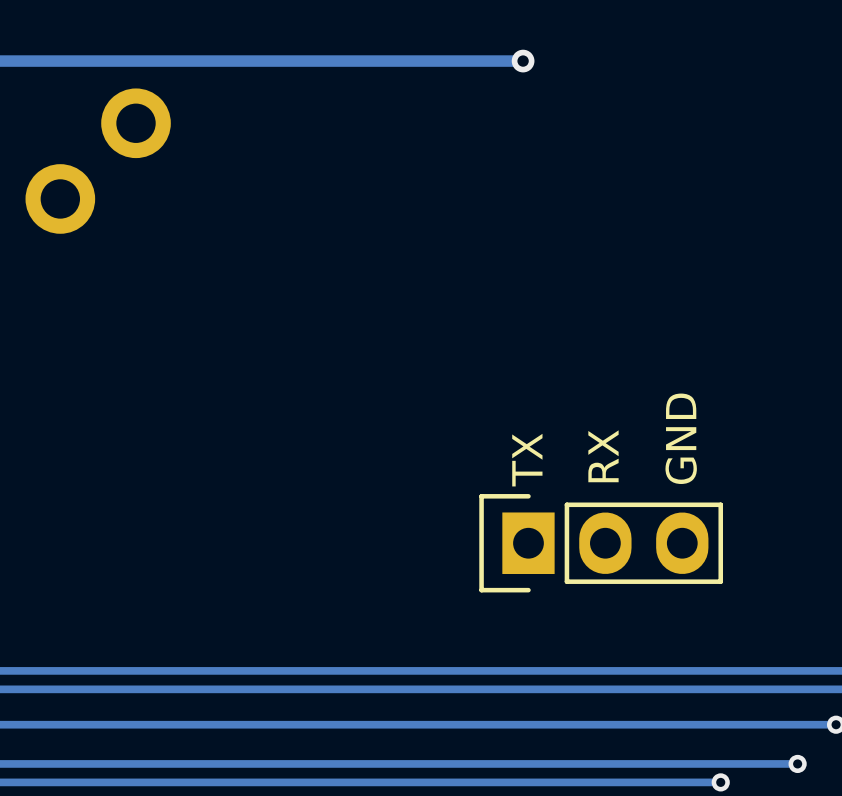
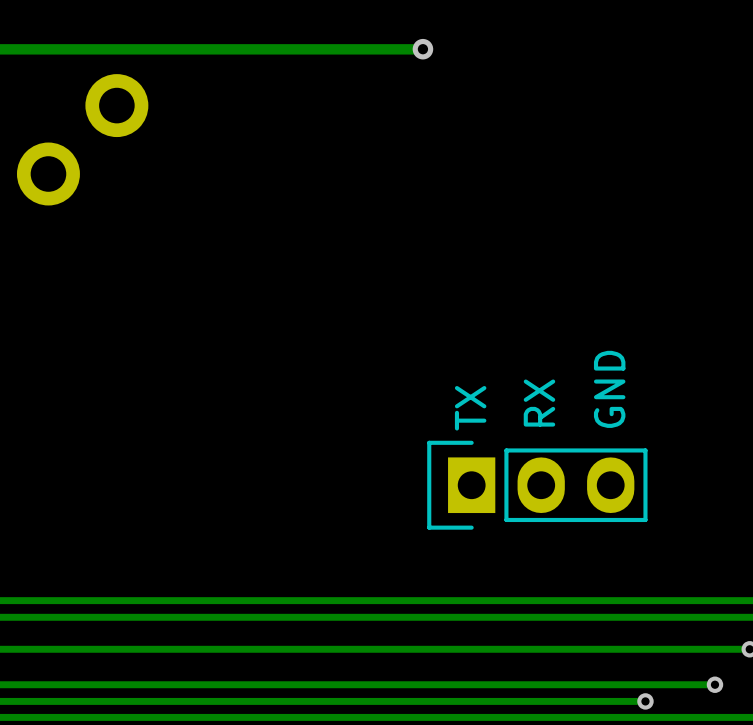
track: (523, 61) (474, 61) -> none
via position: (523, 61) -> (422, 49)

